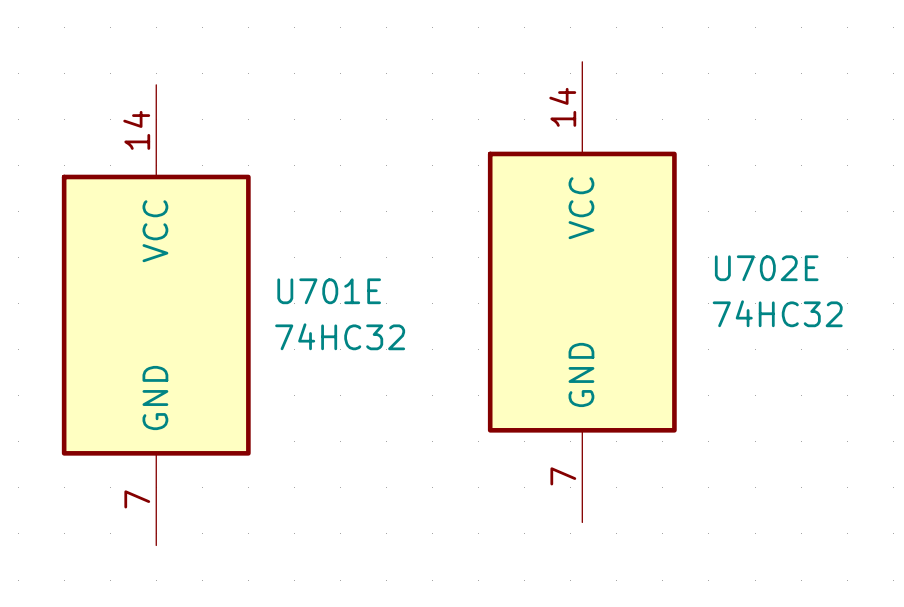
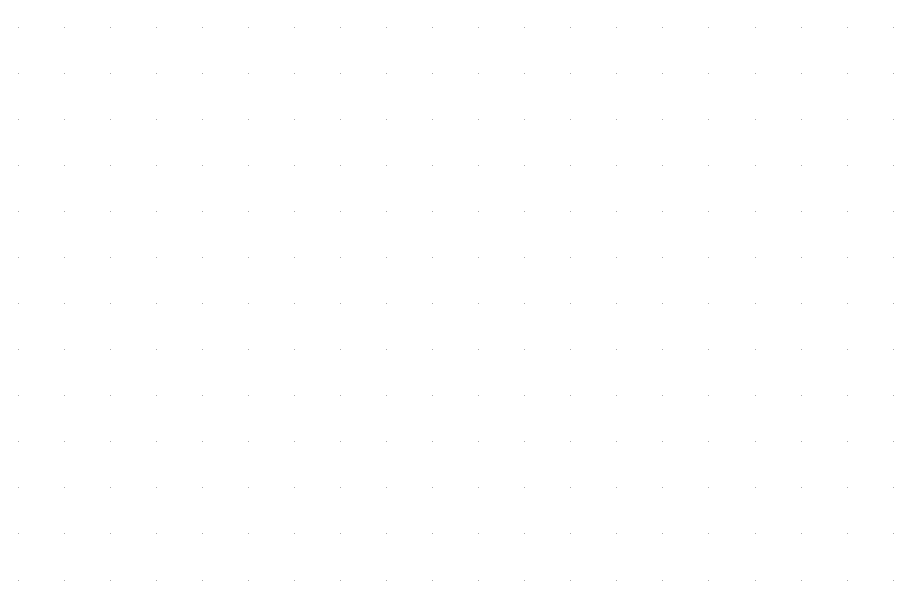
U702E: 74HC32 (582, 292) -> none
U701E: 74HC32 (156, 315) -> none

